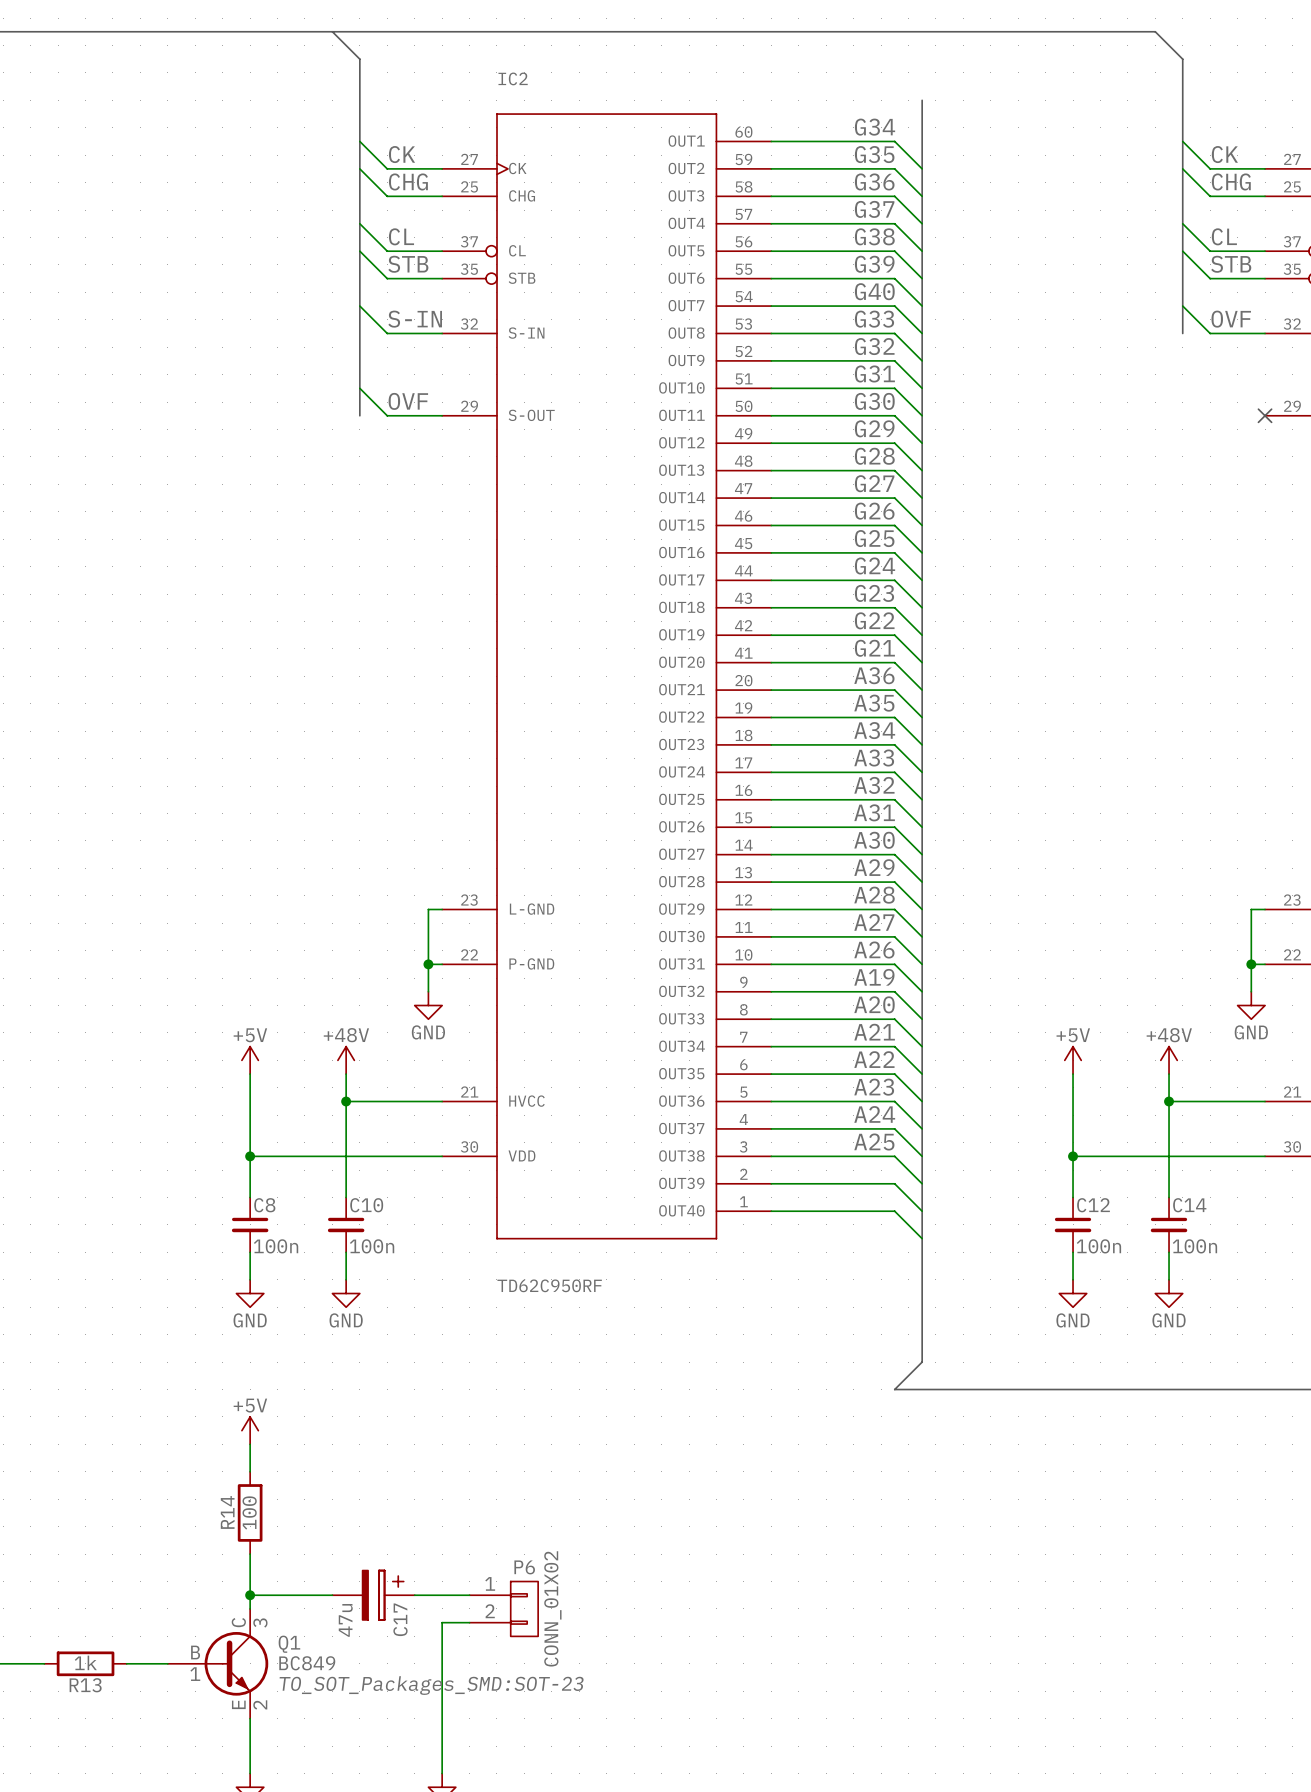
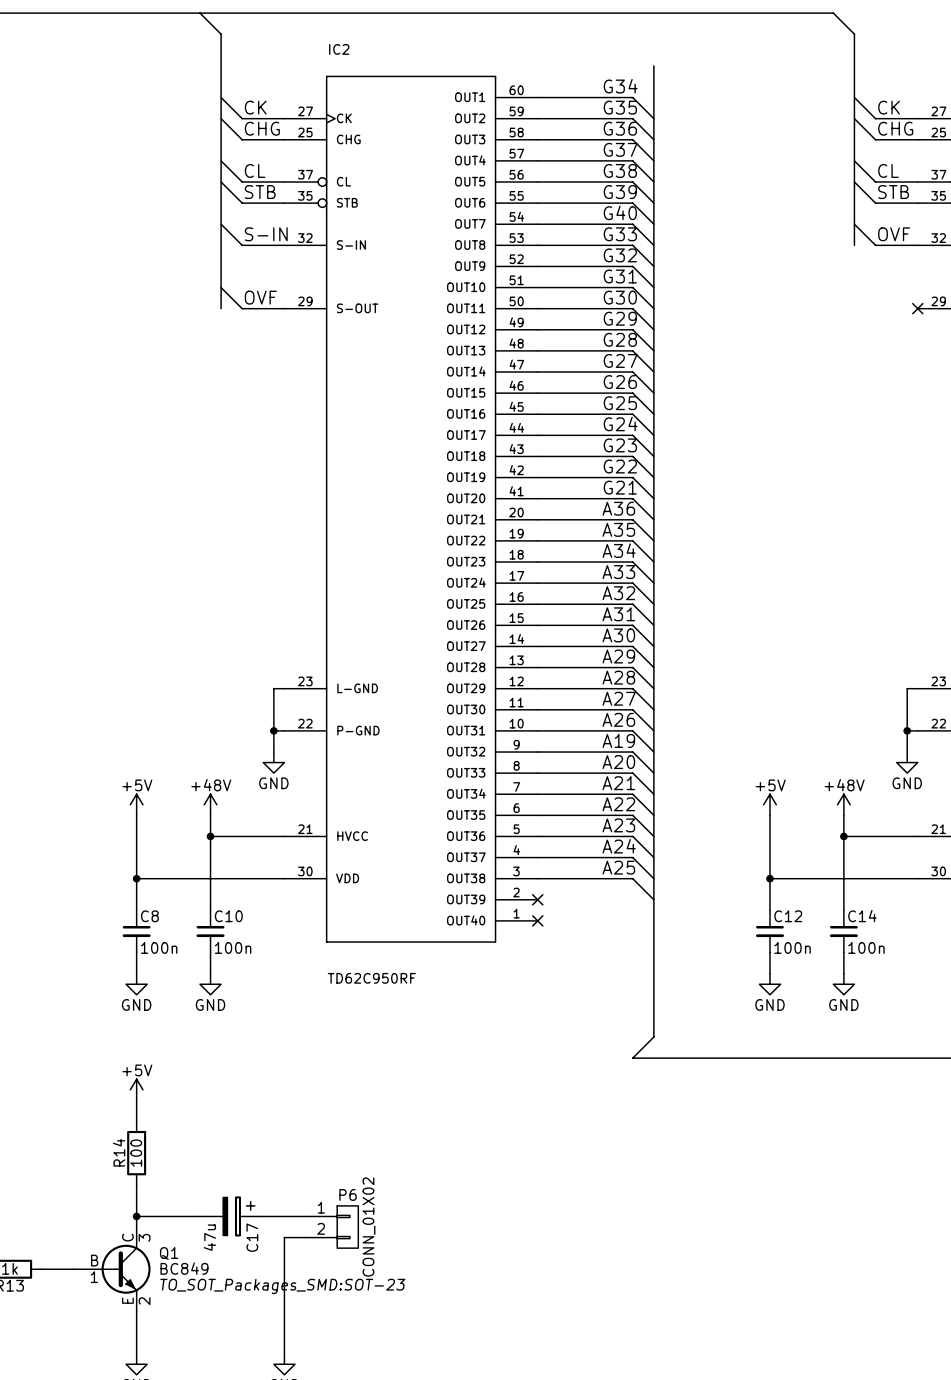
wire: (771, 1183) (894, 1183) (922, 1211) -> none
no-connect mark: none -> (537, 899)
wire: (771, 1211) (894, 1211) (922, 1238) -> none
no-connect mark: none -> (537, 920)

